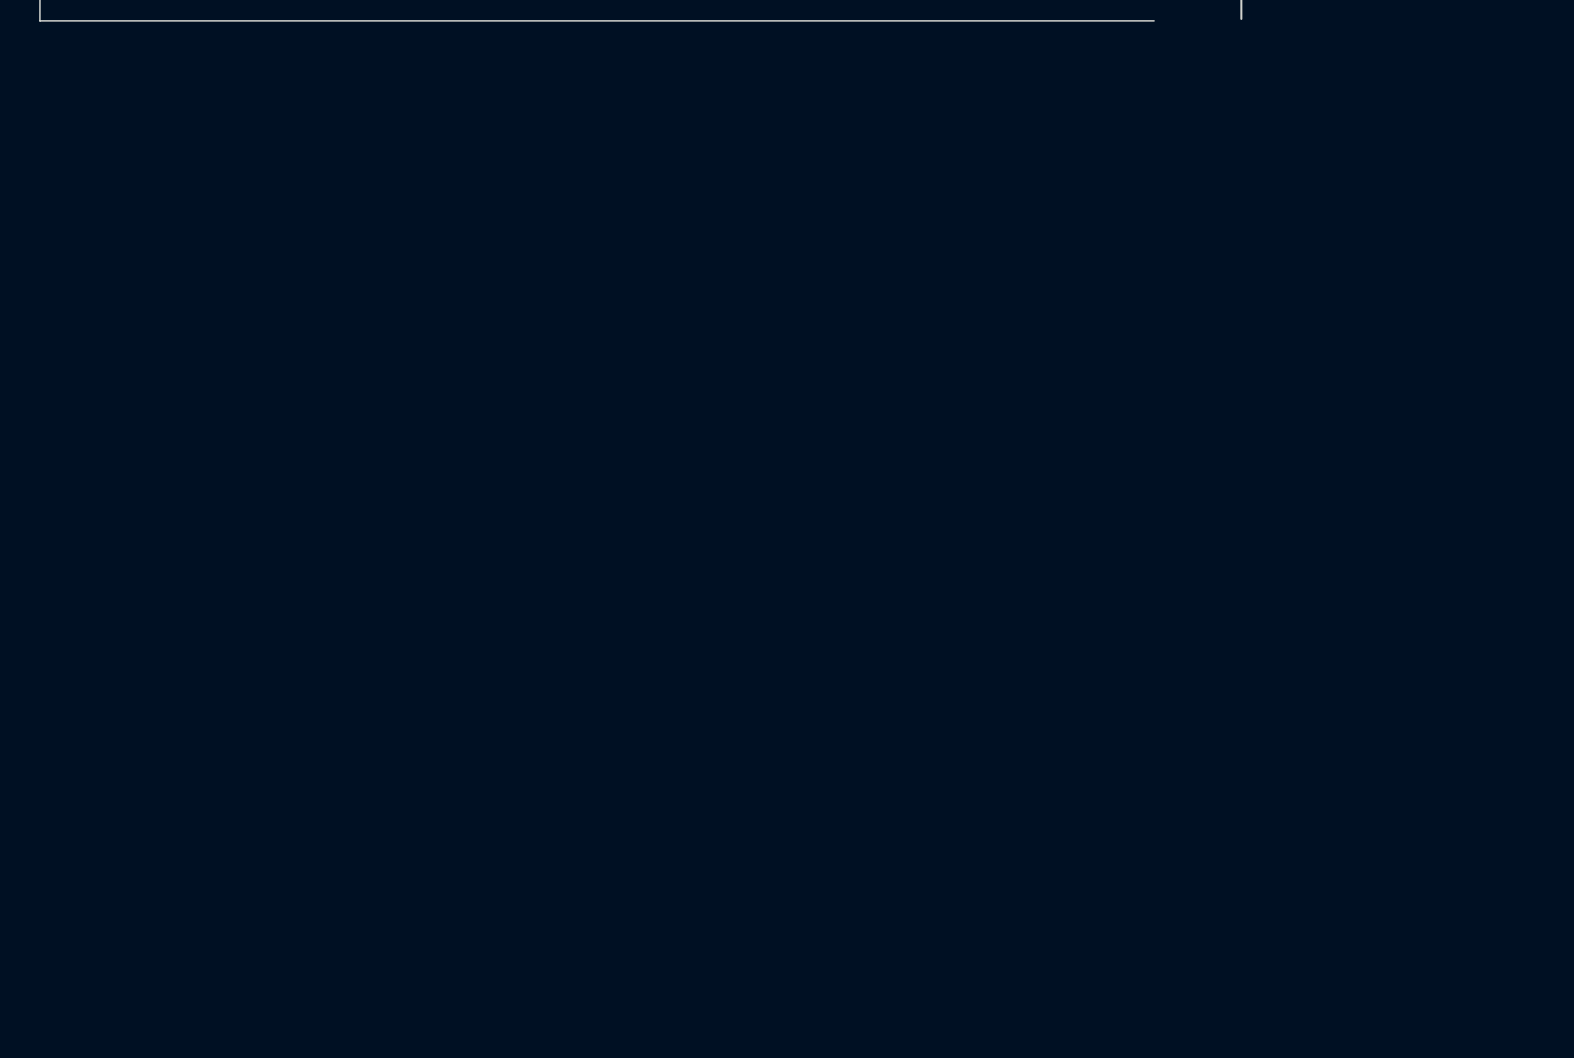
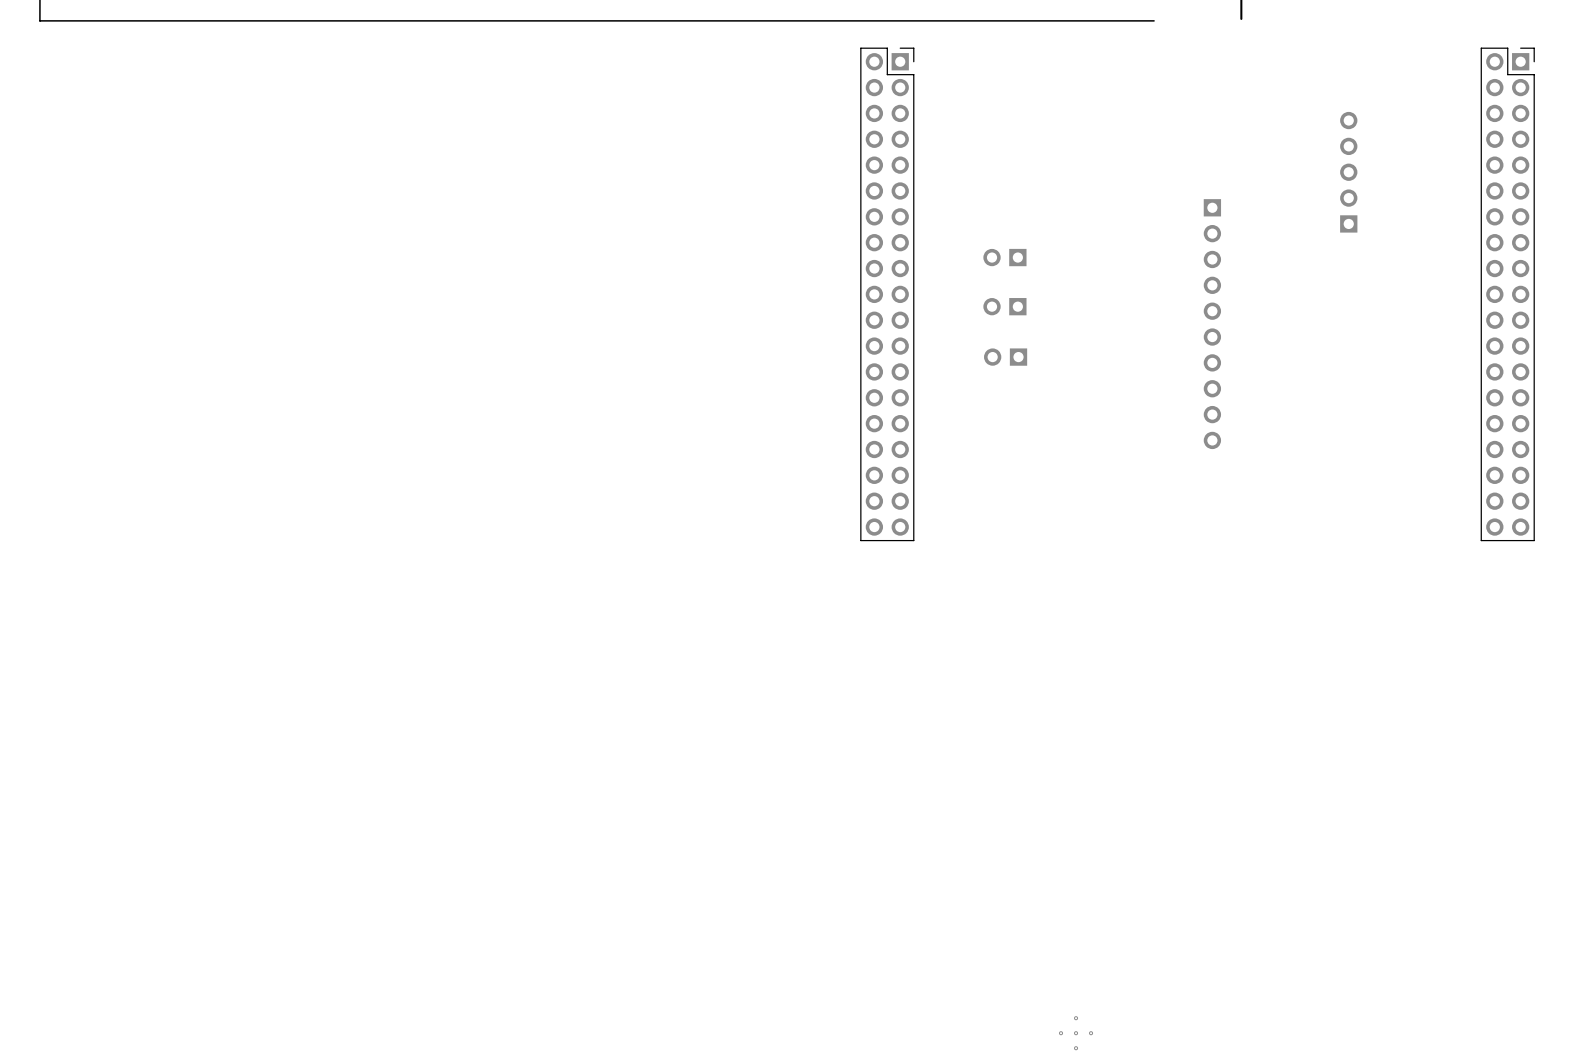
part: none -> (1348, 172)
part: none -> (1004, 257)
part: none -> (887, 294)
part: none -> (1507, 294)
part: none -> (1004, 306)
part: none -> (1212, 324)
part: none -> (1005, 357)
part: none -> (1076, 1033)

